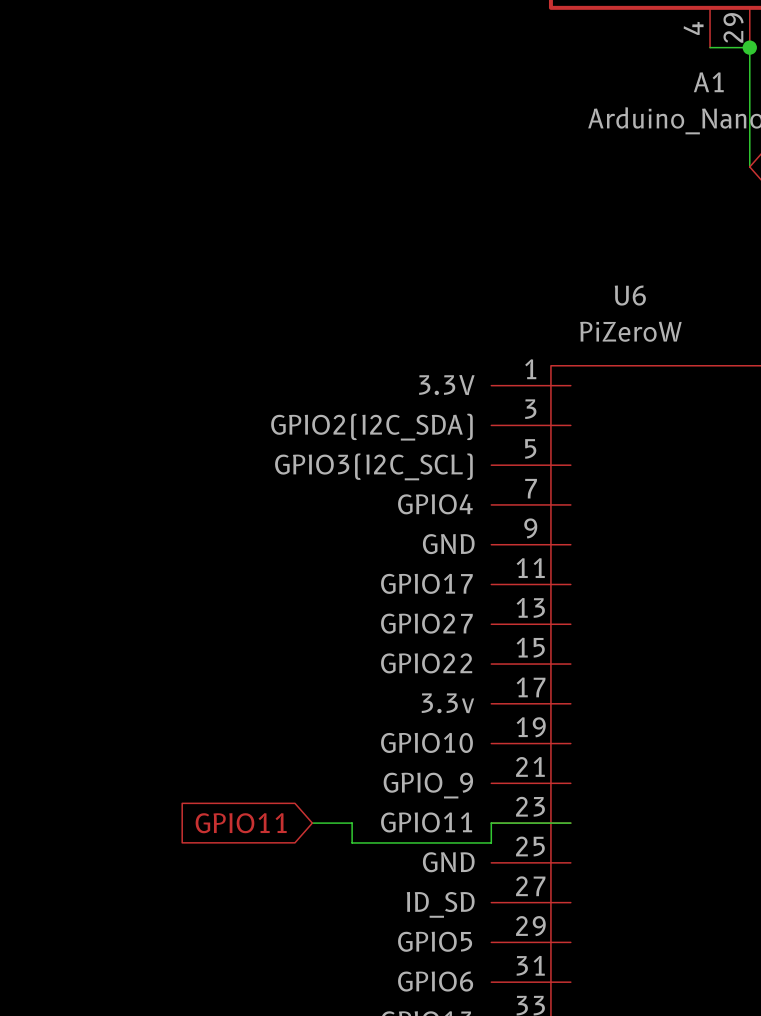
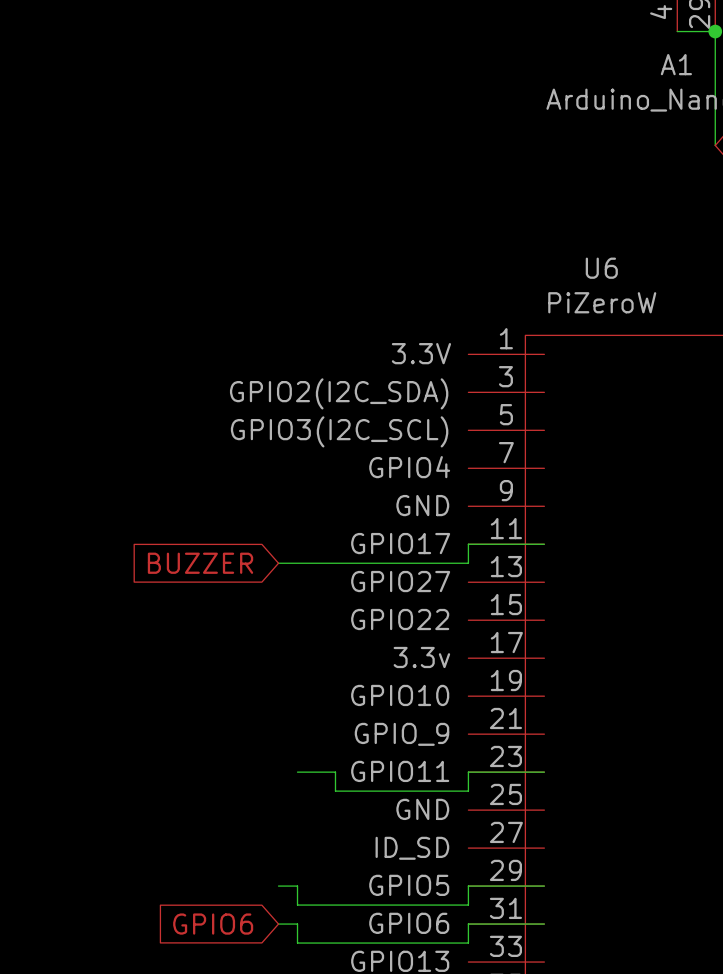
wire: none -> (544, 544) (468, 544) (468, 563) (278, 563)
global label: none -> BUZZER (200, 563)
global label: GPIO11 (241, 823) -> none
wire: none -> (278, 886) (297, 886) (297, 905) (468, 905) (468, 886) (544, 886)
global label: none -> GPIO6 (213, 924)
wire: none -> (278, 924) (297, 924) (297, 943) (468, 943) (468, 924) (544, 924)

